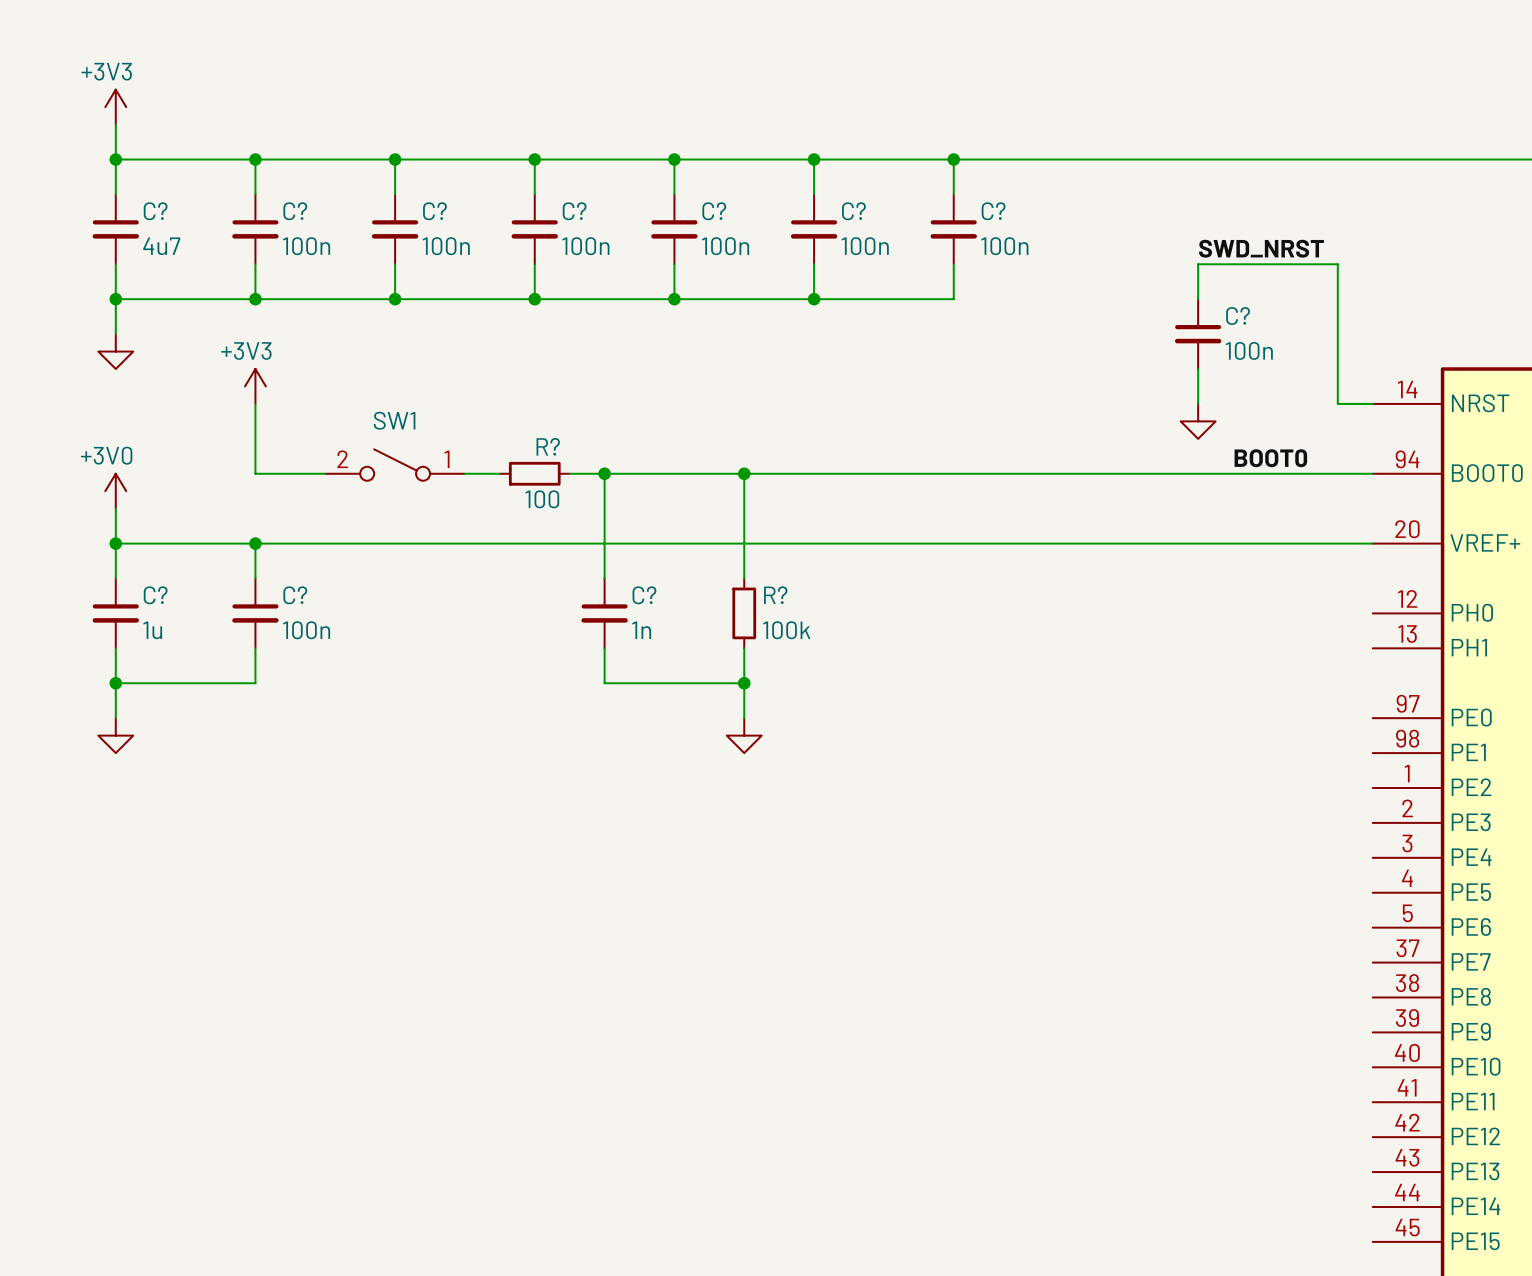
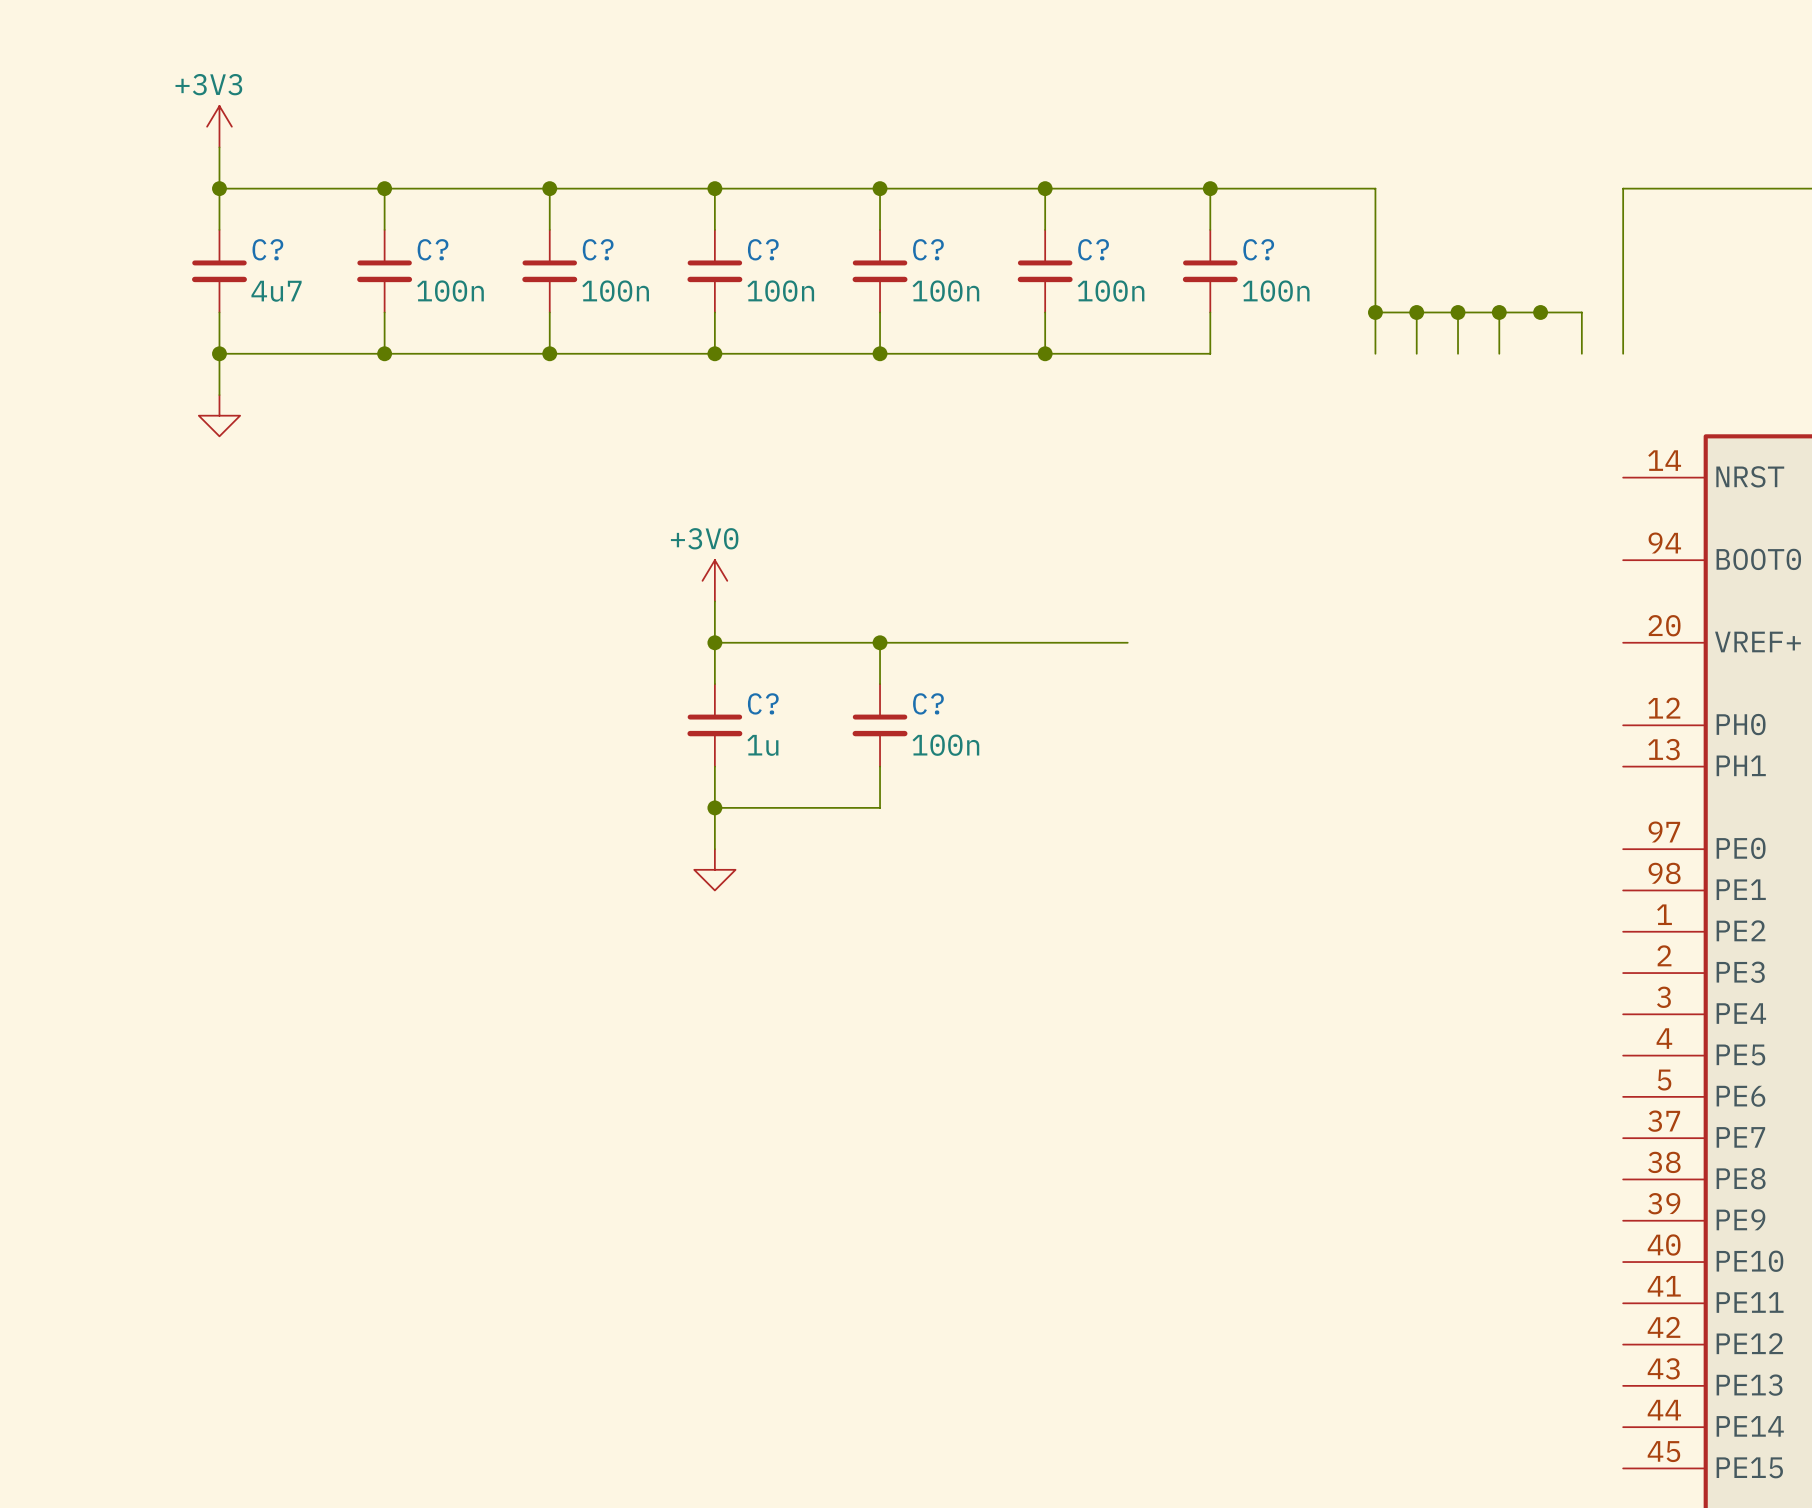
power symbol position: +3V3 (115, 107) -> +3V3 (219, 126)
wire: (115, 124) (115, 194) -> (219, 147) (219, 229)
wire: (115, 159) (185, 159) -> none
junction: (115, 159) -> none
junction: none -> (219, 188)
wire: (255, 159) (255, 194) -> (384, 188) (384, 229)
junction: (255, 159) -> none
junction: none -> (384, 188)
wire: (395, 159) (395, 194) -> (549, 188) (549, 229)
junction: (395, 159) -> none
junction: none -> (549, 188)
wire: (534, 159) (534, 194) -> (714, 188) (714, 229)
junction: (534, 159) -> none
junction: none -> (714, 188)
wire: (674, 159) (674, 194) -> (880, 188) (880, 229)
junction: (674, 159) -> none
junction: none -> (880, 188)
wire: (814, 159) (814, 194) -> (1045, 188) (1045, 229)
junction: (814, 159) -> none
junction: none -> (1045, 188)
wire: (953, 159) (953, 194) -> (1210, 188) (1210, 229)
junction: (953, 159) -> none
junction: none -> (1210, 188)
wire: (1163, 159) (1372, 159) -> (1375, 188) (1375, 353)
wire: none -> (1623, 188) (1623, 353)
C? position: (115, 229) -> (219, 271)
C?: 100n (255, 229) -> none
C?: none -> 100n (384, 271)
C?: 100n (395, 229) -> none
C?: none -> 100n (549, 271)
C?: 100n (534, 229) -> none
C?: none -> 100n (714, 271)
C?: 100n (674, 229) -> none
C?: none -> 100n (880, 271)
C?: 100n (814, 229) -> none
C?: none -> 100n (1045, 271)
C?: 100n (953, 229) -> none
C?: none -> 100n (1210, 271)
label: SWD_NRST (1261, 248) -> none
wire: (115, 264) (115, 334) -> (219, 312) (219, 395)
wire: (255, 264) (255, 299) -> (384, 312) (384, 353)
wire: (395, 264) (395, 299) -> (549, 312) (549, 353)
wire: (534, 264) (534, 299) -> (714, 312) (714, 353)
wire: (674, 264) (674, 299) -> (880, 312) (880, 353)
wire: (814, 264) (814, 299) -> (1045, 312) (1045, 353)
wire: (953, 264) (953, 299) -> (1210, 312) (1210, 353) (1127, 353)
wire: none -> (1375, 312) (1416, 312)
junction: none -> (1375, 312)
junction: none -> (1416, 312)
wire: none -> (1458, 312) (1458, 353)
junction: none -> (1458, 312)
junction: none -> (1499, 312)
junction: none -> (1540, 312)
wire: (115, 299) (185, 299) -> none
junction: (115, 299) -> none
junction: none -> (219, 353)
junction: (255, 299) -> none
junction: none -> (384, 353)
junction: (395, 299) -> none
junction: none -> (549, 353)
junction: (534, 299) -> none
junction: none -> (714, 353)
junction: (674, 299) -> none
junction: none -> (880, 353)
junction: (814, 299) -> none
junction: none -> (1045, 353)
wire: (1337, 299) (1337, 403) (1372, 403) -> none
C?: 100n (1198, 334) -> none
power symbol position: (115, 351) -> (219, 415)
wire: (1198, 369) (1198, 403) -> (1499, 312) (1499, 353)
power symbol: +3V3 (255, 386) -> none
wire: (255, 403) (255, 473) (325, 473) -> none
power symbol: (1198, 421) -> none
label: BOOT0 (1270, 458) -> none
SW1: (395, 465) -> none
wire: (464, 473) (499, 473) -> none
R?: 100 (534, 473) -> none
wire: (569, 473) (1372, 473) -> none
junction position: (604, 473) -> (714, 642)
wire: (744, 473) (744, 543) -> none
junction: (744, 473) -> none
power symbol: +3V0 (115, 491) -> none
power symbol: none -> +3V0 (714, 580)
wire: (115, 508) (115, 578) -> none
wire: (115, 543) (604, 543) -> none
junction: (115, 543) -> none
wire: (255, 543) (255, 578) -> none
junction: (255, 543) -> none
junction: none -> (880, 642)
wire: (953, 543) (1372, 543) -> none
C?: 1u (115, 613) -> none
C?: 100n (255, 613) -> none
R?: 100k (744, 613) -> none
C?: none -> 100n (880, 725)
C? value: 1n (641, 630) -> 1u (762, 745)
wire: (115, 648) (115, 718) -> none
wire: (255, 648) (255, 683) (115, 683) -> none
junction: (115, 683) -> none
junction: none -> (714, 807)
wire: (744, 683) (744, 718) -> (714, 807) (714, 849)
junction: (744, 683) -> none
power symbol: (115, 735) -> none
power symbol position: (744, 735) -> (714, 869)

